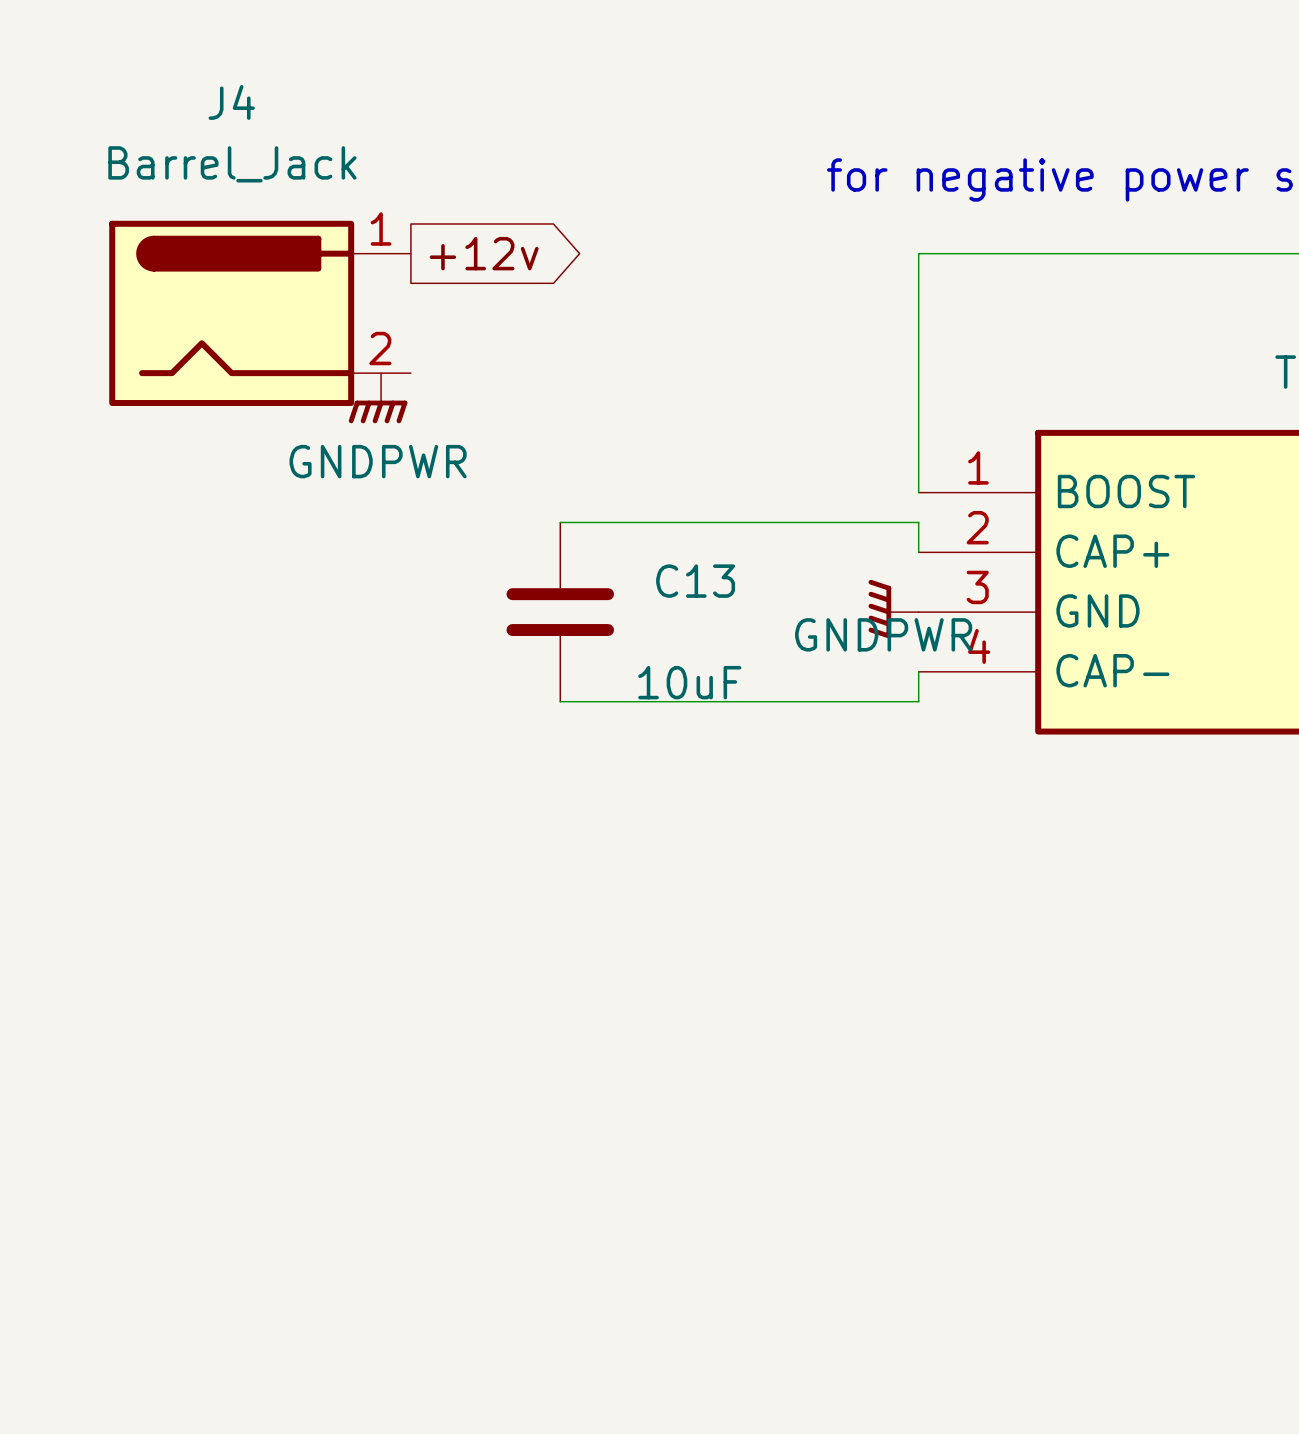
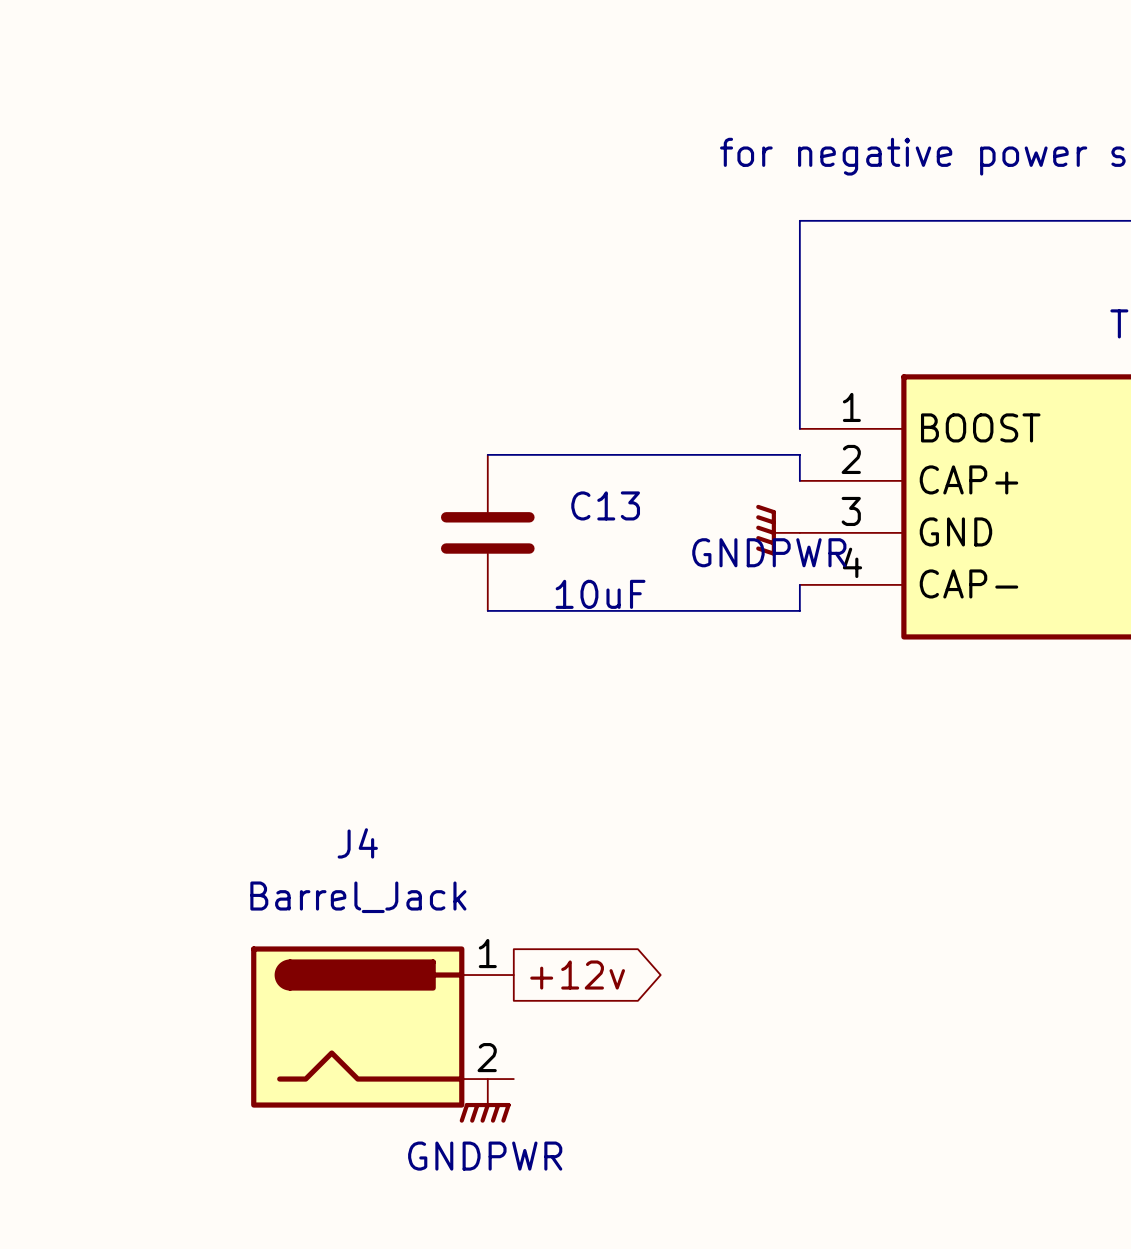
global label: +12v (484, 253) -> none
J4 position: (260, 313) -> (382, 1027)
power symbol: GNDPWR (378, 398) -> none
global label: none -> +12v (577, 975)
power symbol: none -> GNDPWR (485, 1100)

